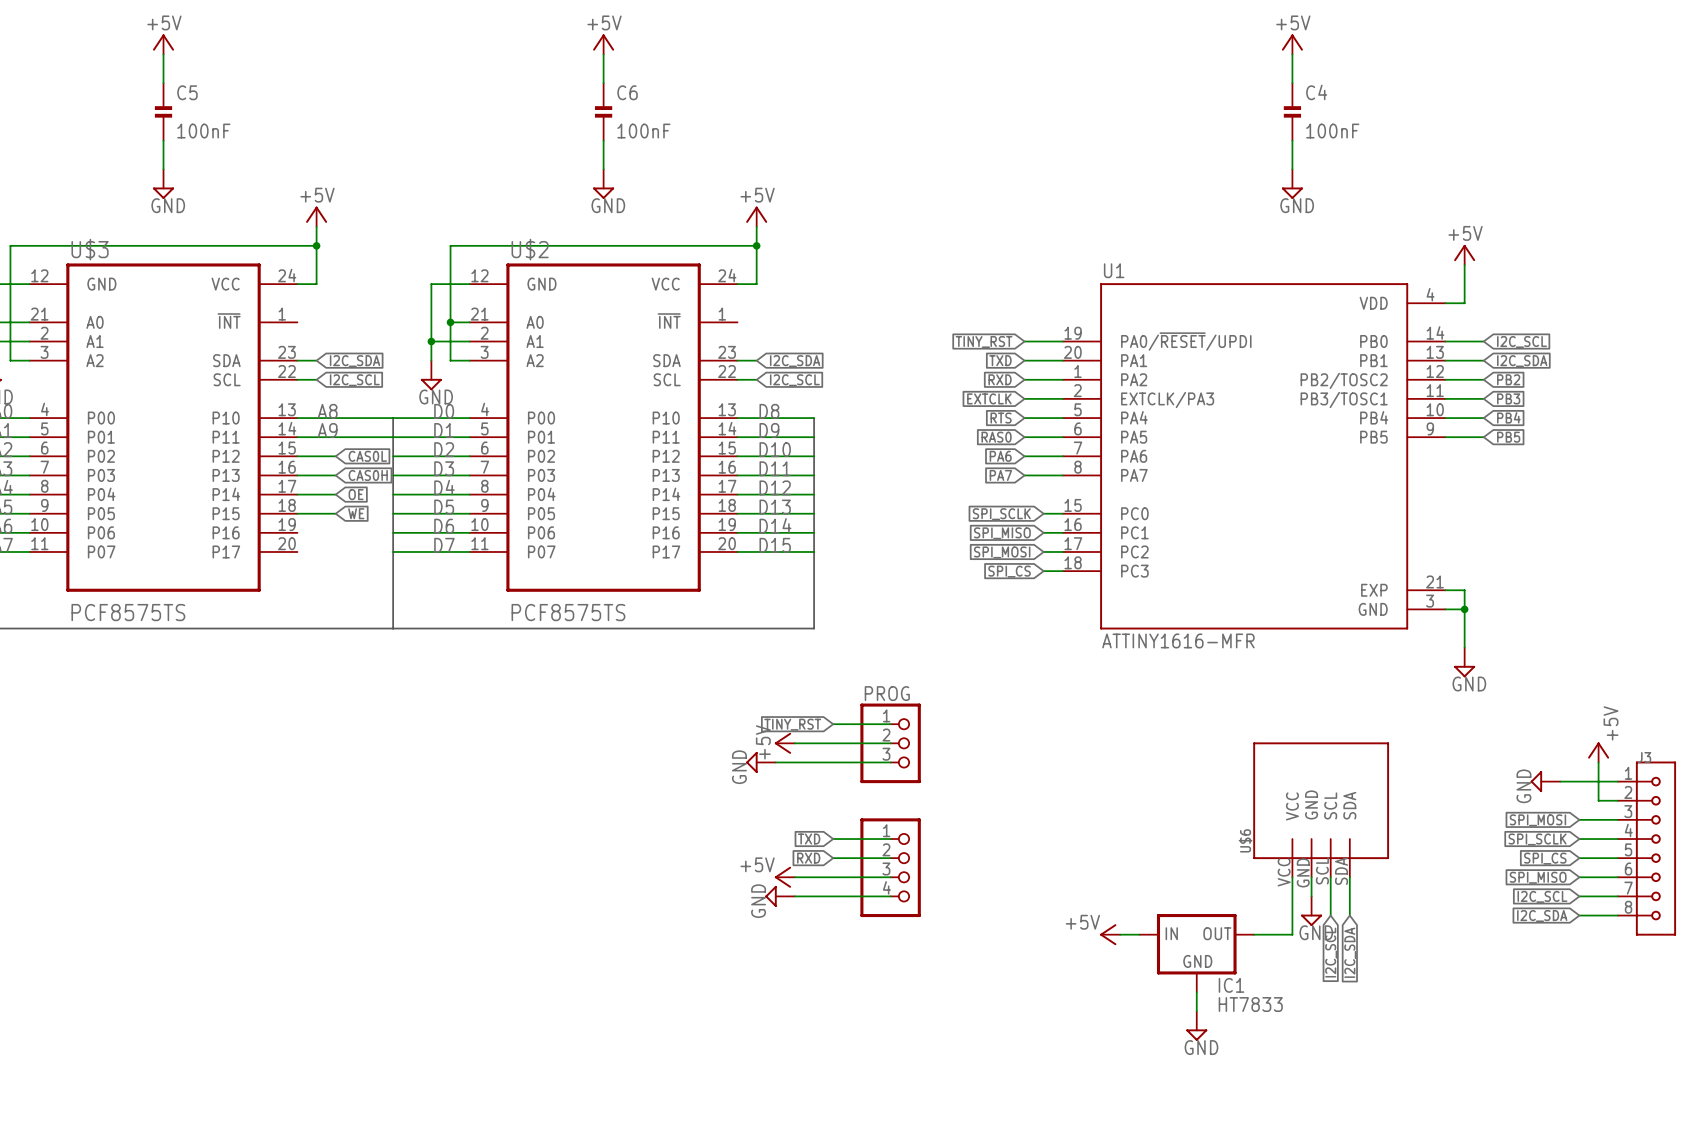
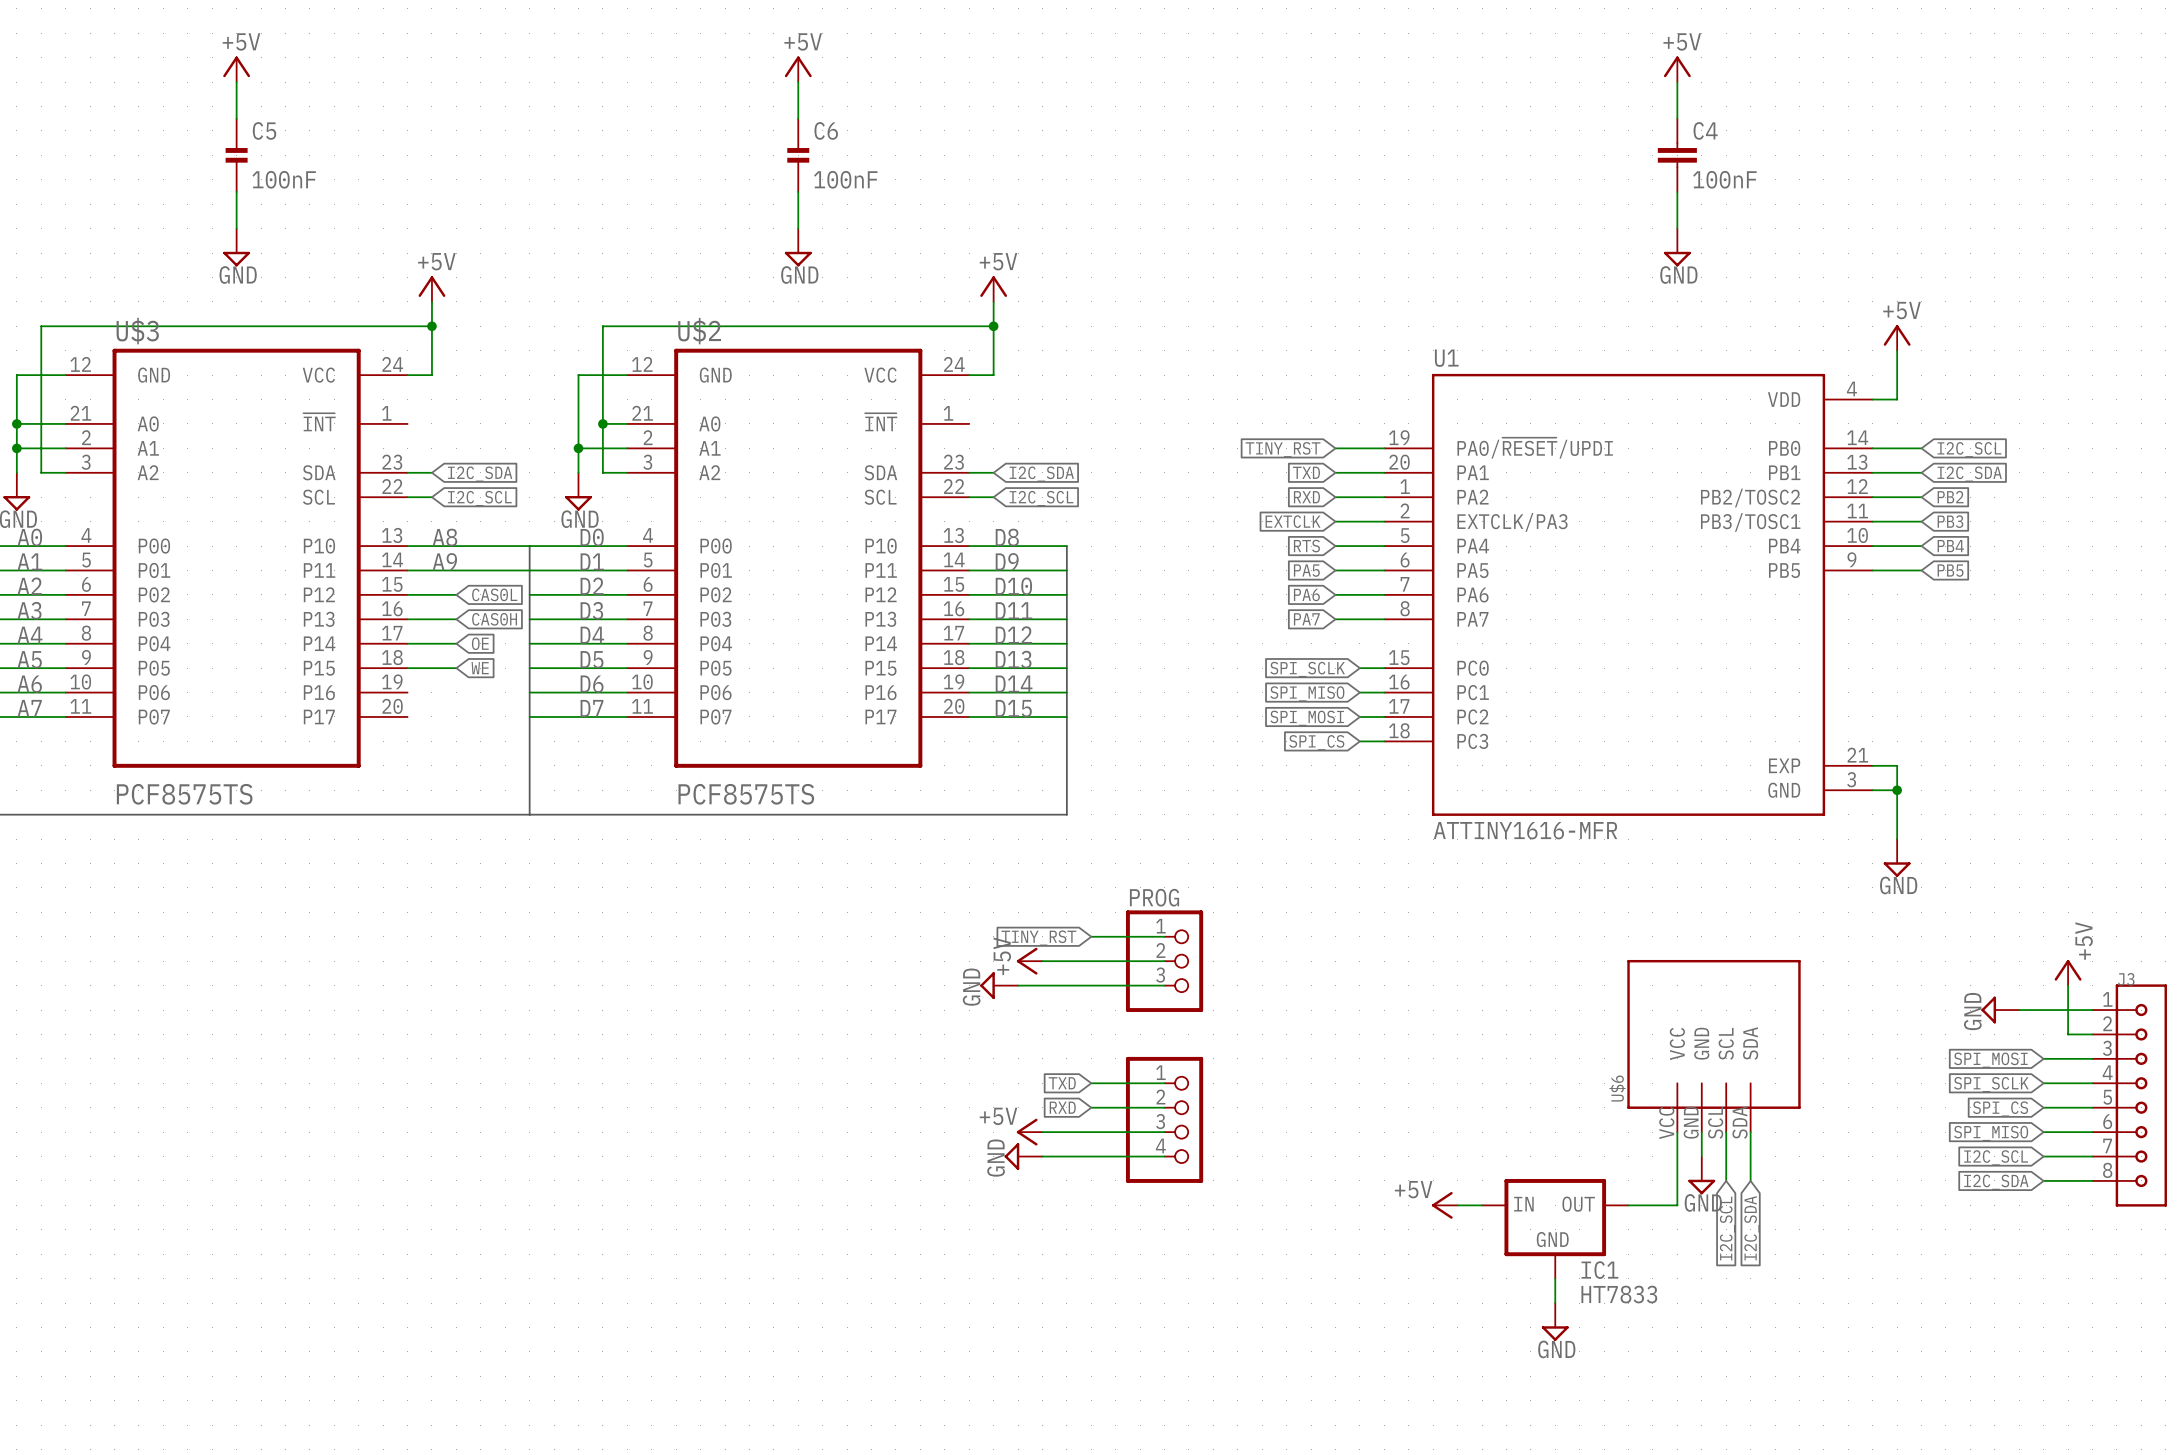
C4 symbol: [1283, 82, 1302, 142] -> [1657, 118, 1697, 192]
global label: RAS0 (996, 437) -> PA5 (1306, 570)

